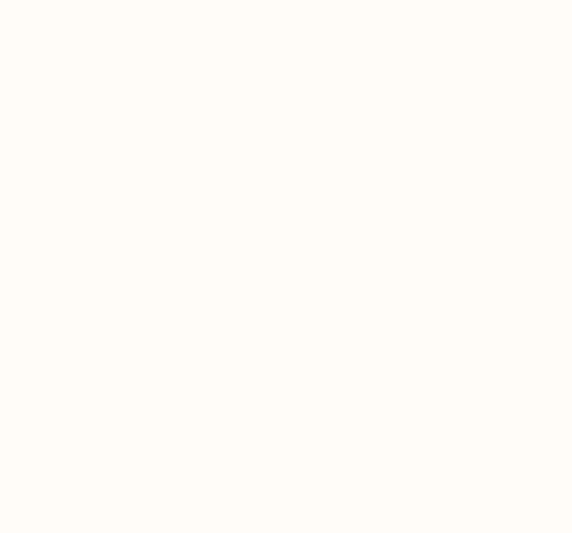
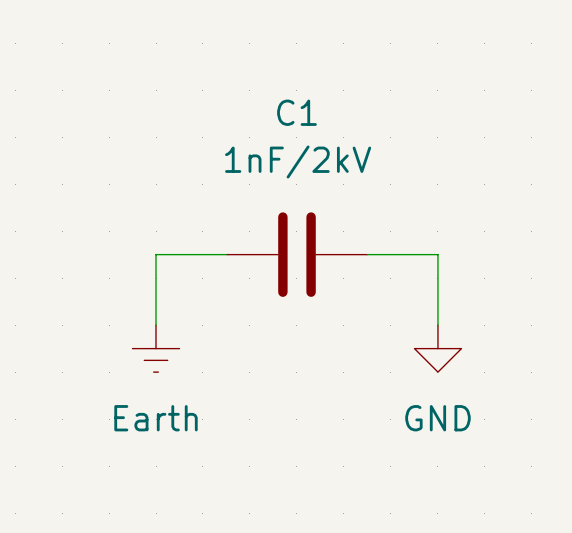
wire: none -> (226, 254) (156, 254) (156, 325)
C1: none -> 1nF/2kV (296, 254)
wire: none -> (367, 254) (437, 254) (437, 325)
power symbol: none -> Earth (156, 348)
power symbol: none -> GND (437, 348)

